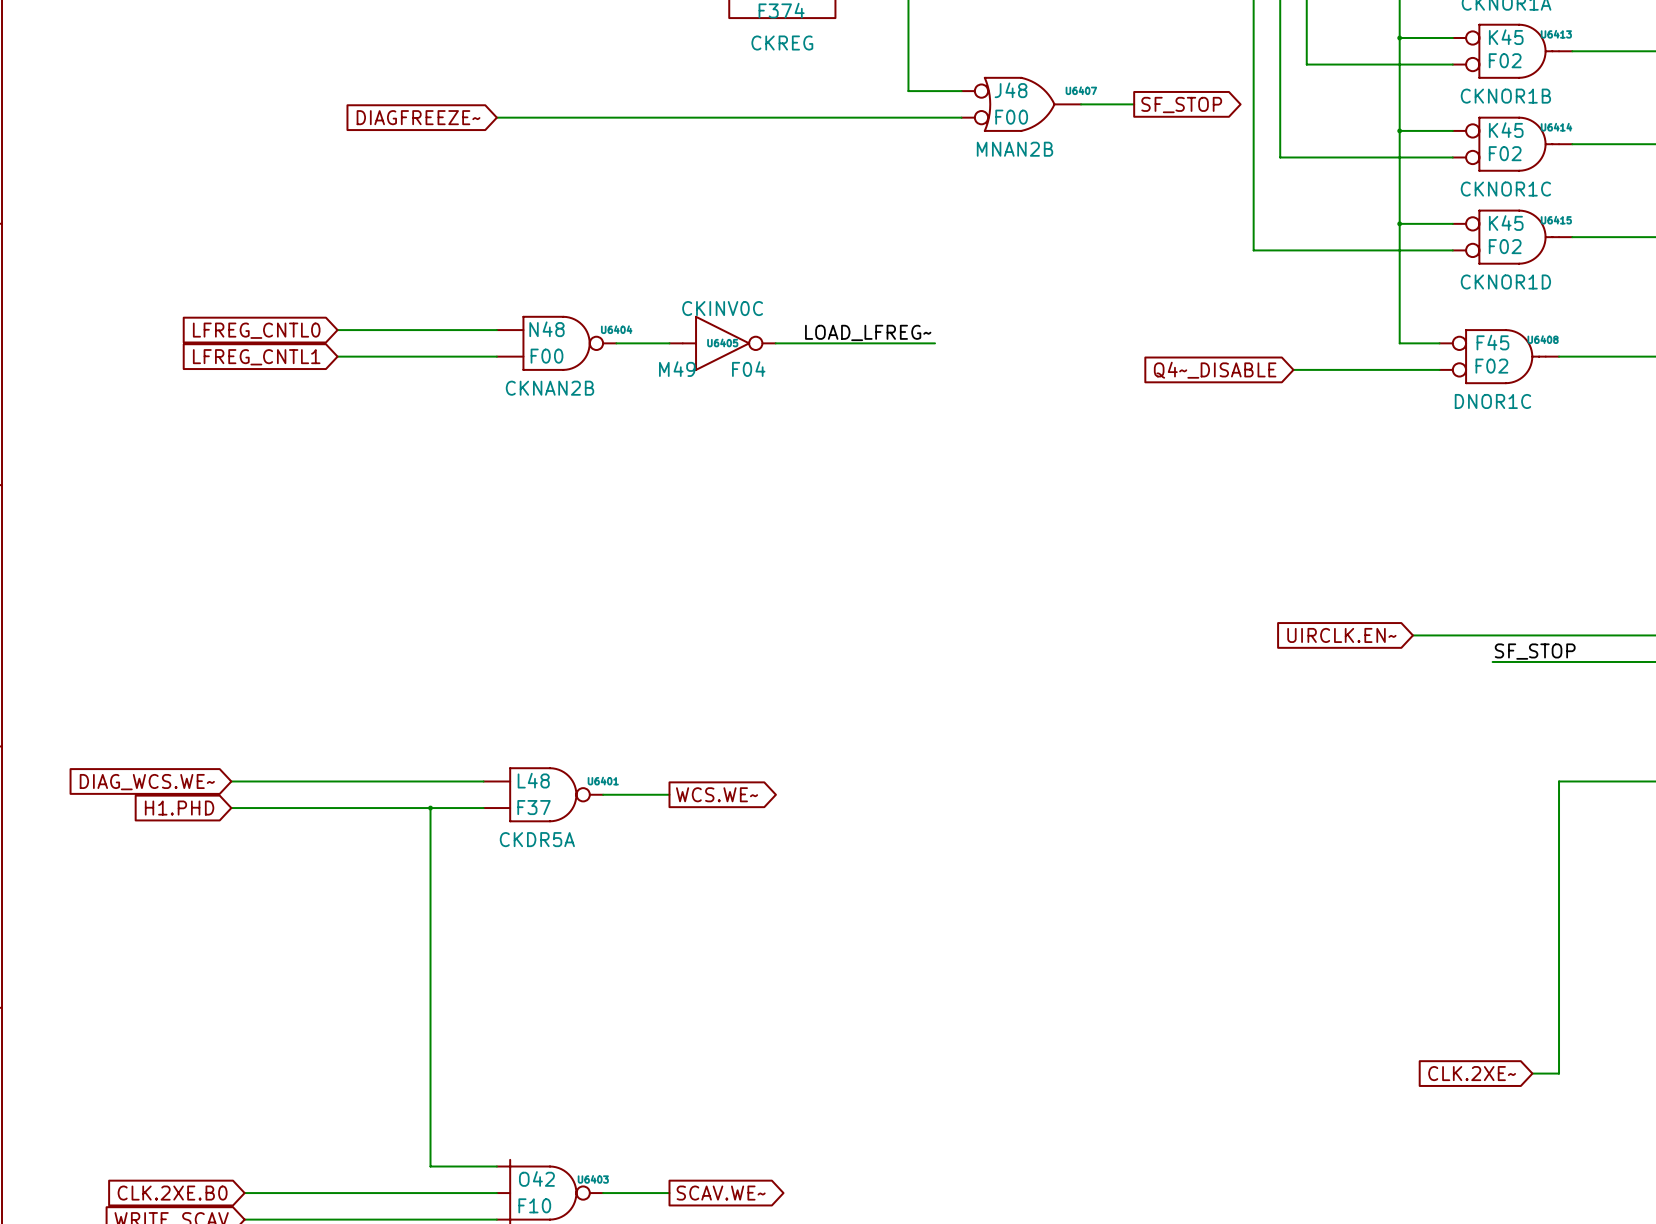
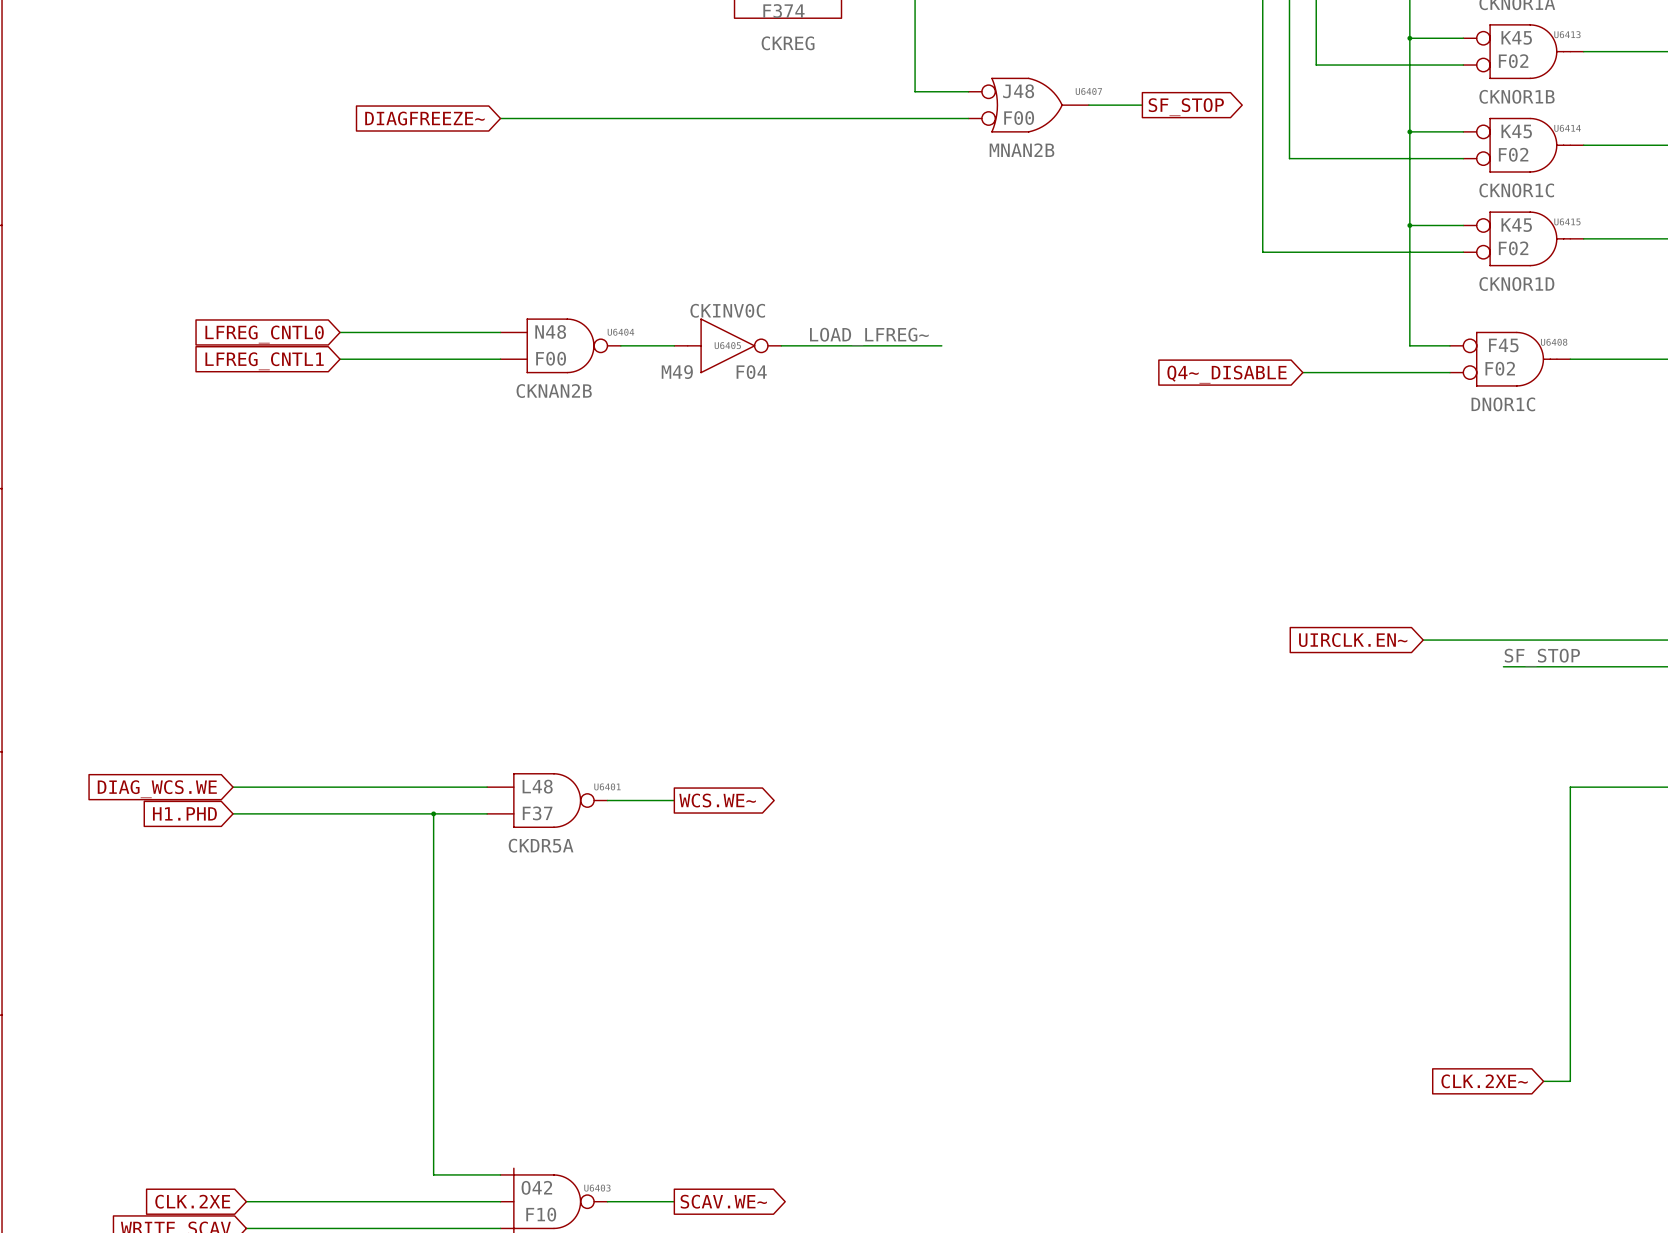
global label: DIAG_WCS.WE~ (147, 782) -> DIAG_WCS.WE (157, 789)
global label: CLK.2XE.B0 (172, 1193) -> CLK.2XE (192, 1201)

